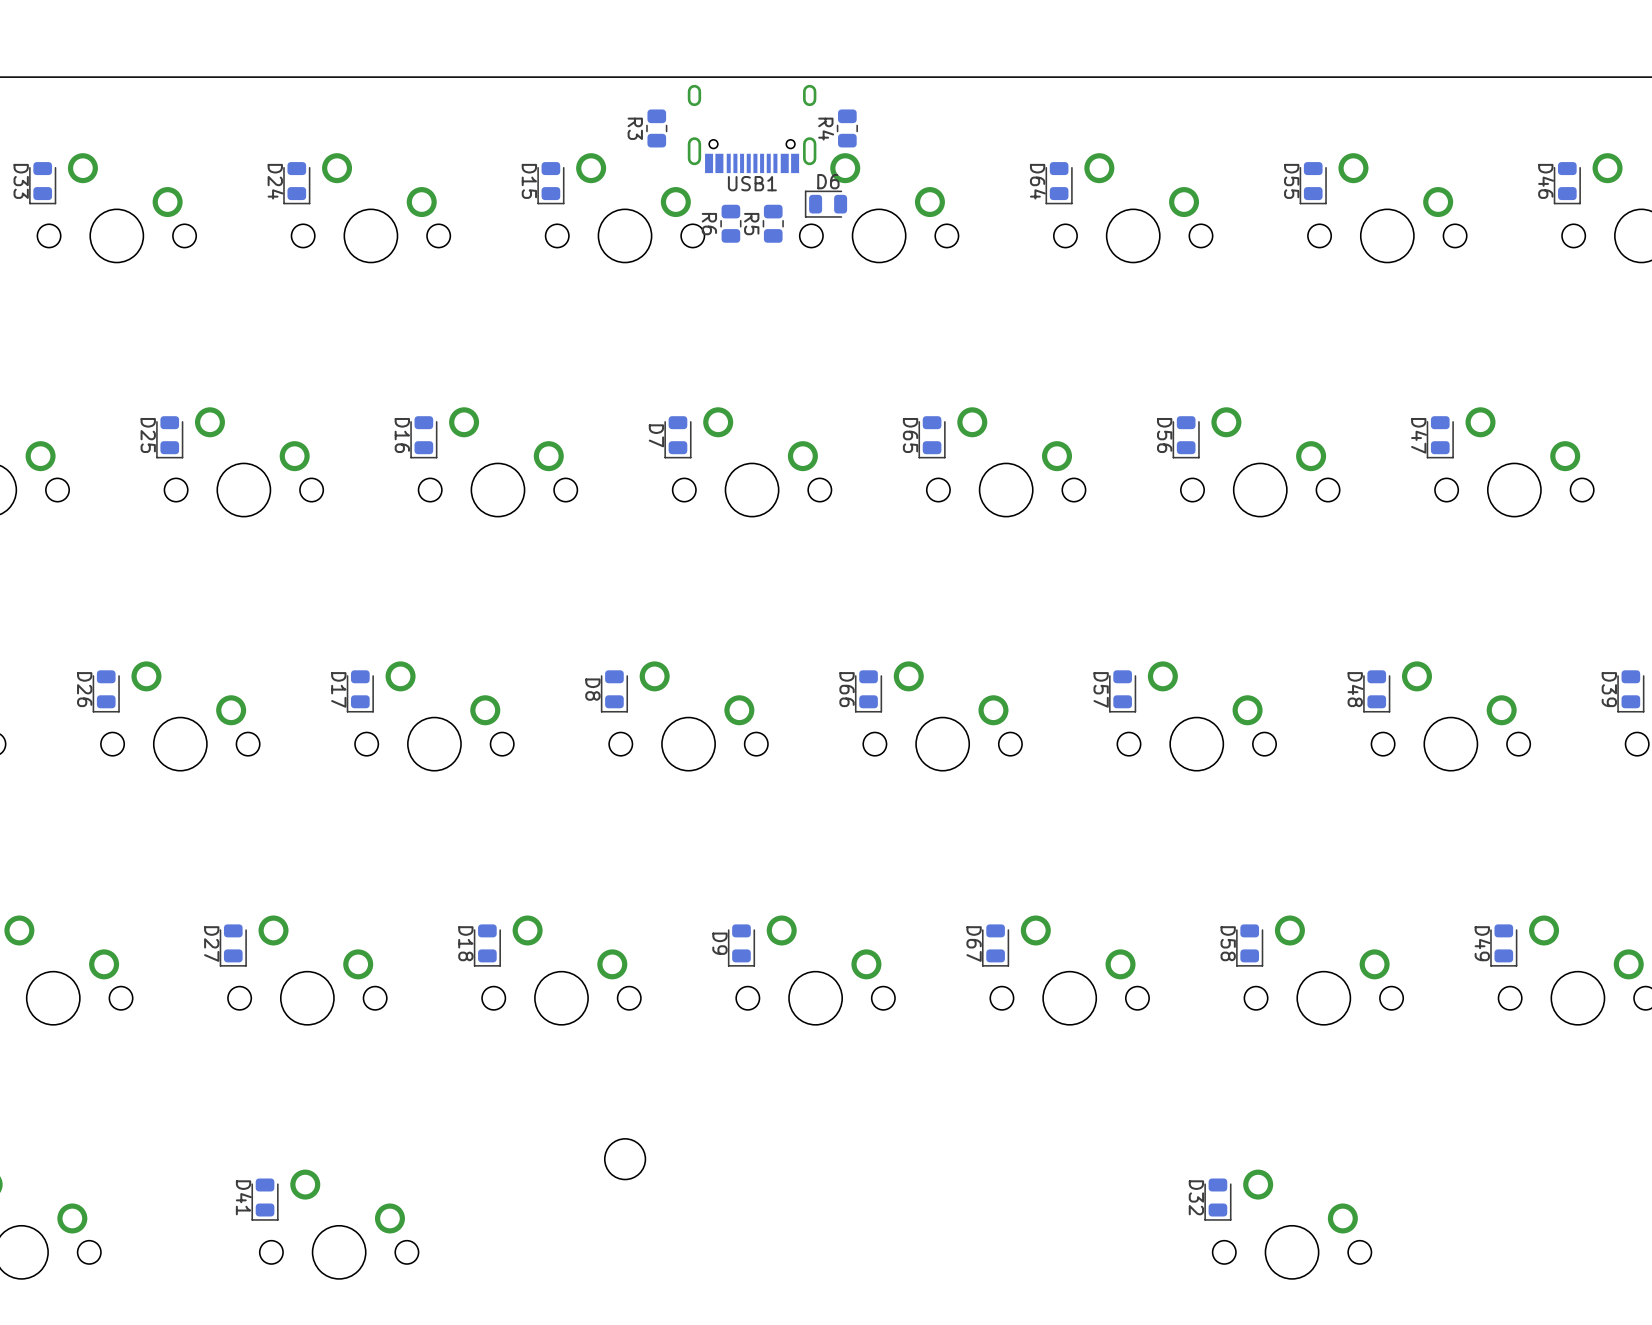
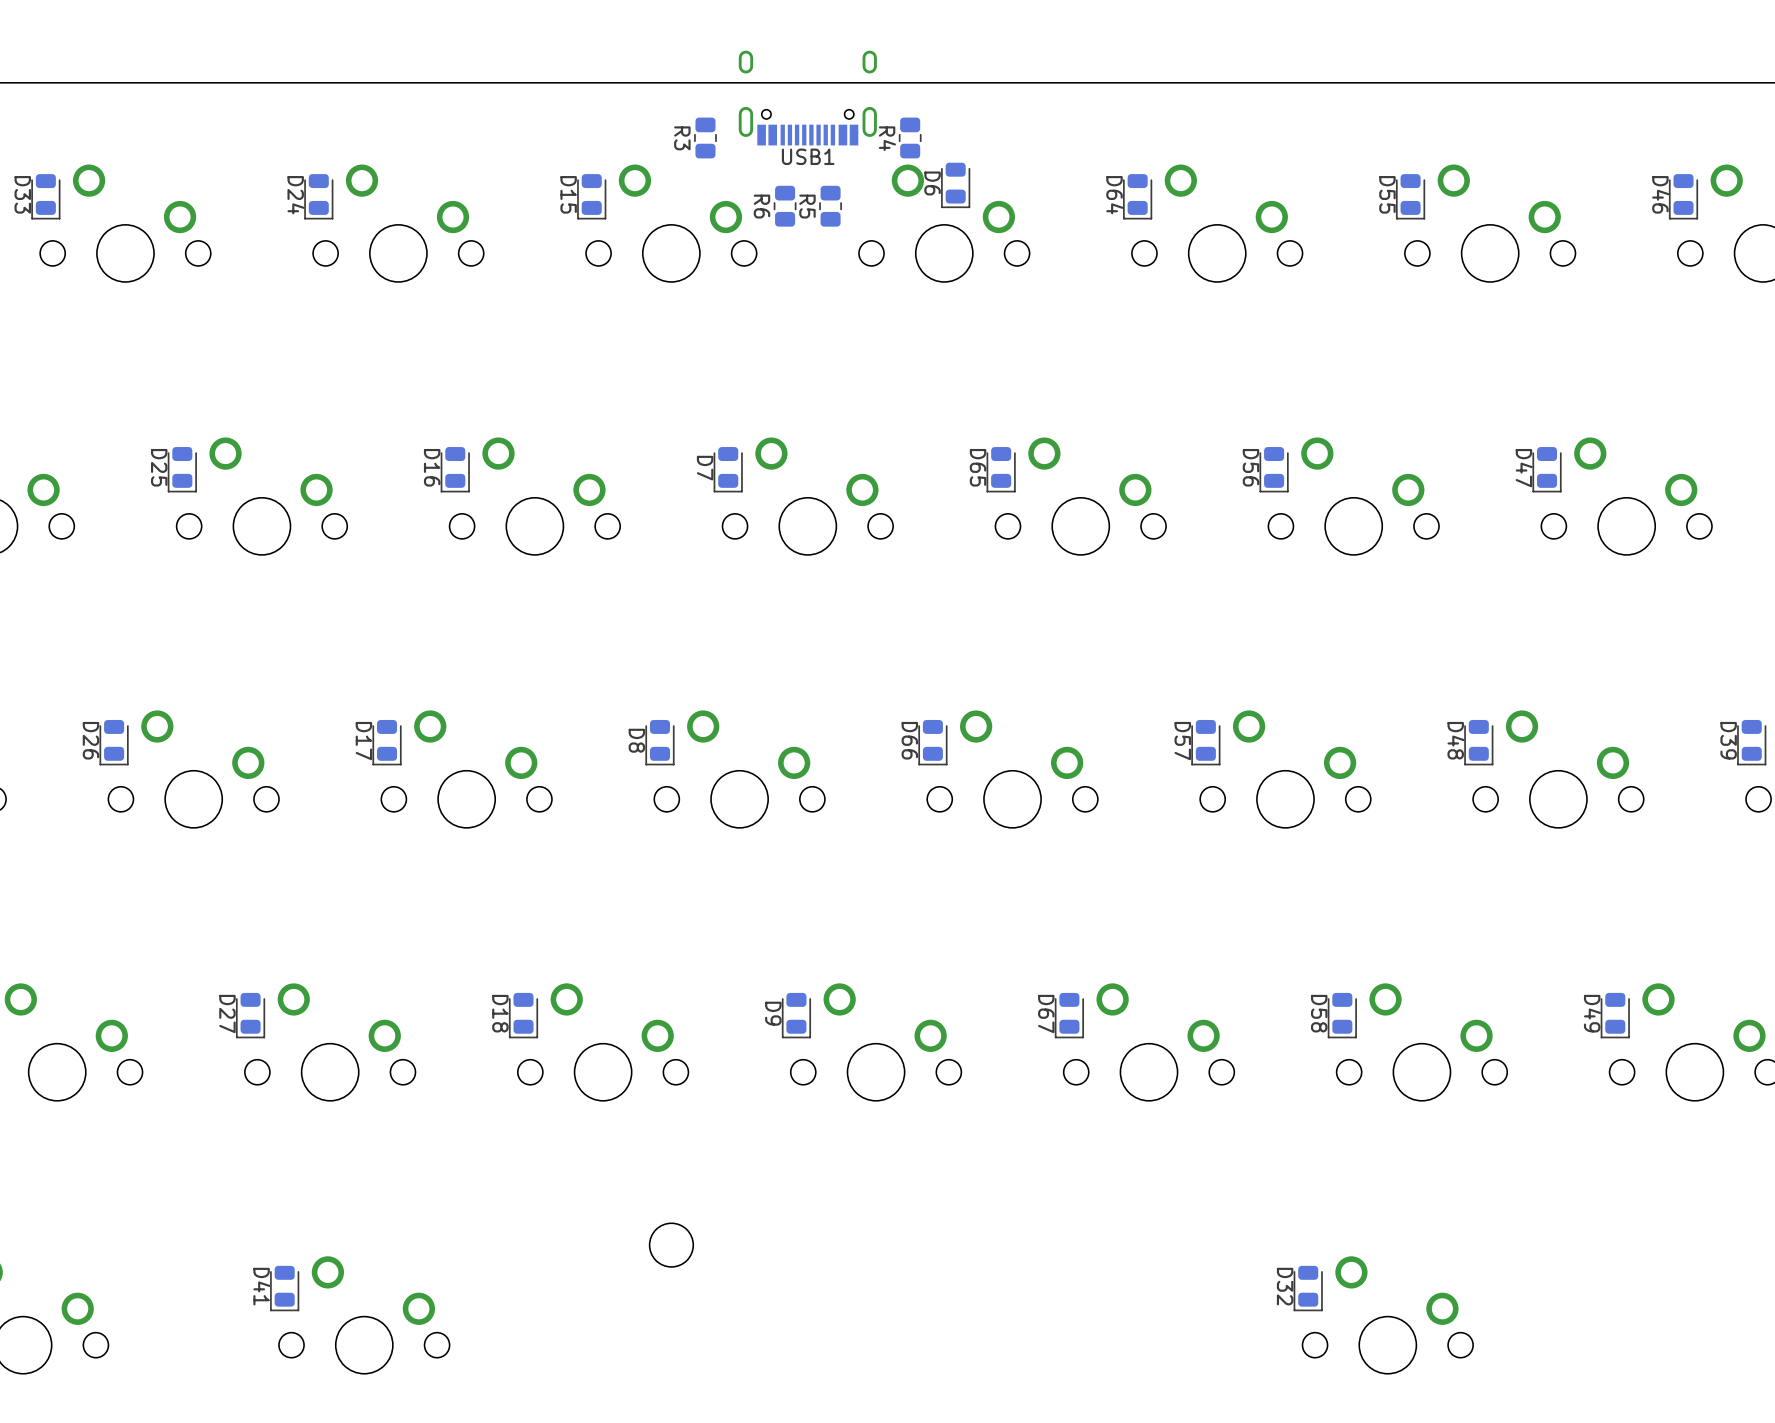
USB1 position: (752, 128) -> (807, 98)
D6 rotation: 0° (825, 204) -> 90° counterclockwise (955, 185)
D6 position: (825, 204) -> (955, 185)
R6 position: (730, 223) -> (785, 206)
R5 position: (773, 223) -> (830, 206)

